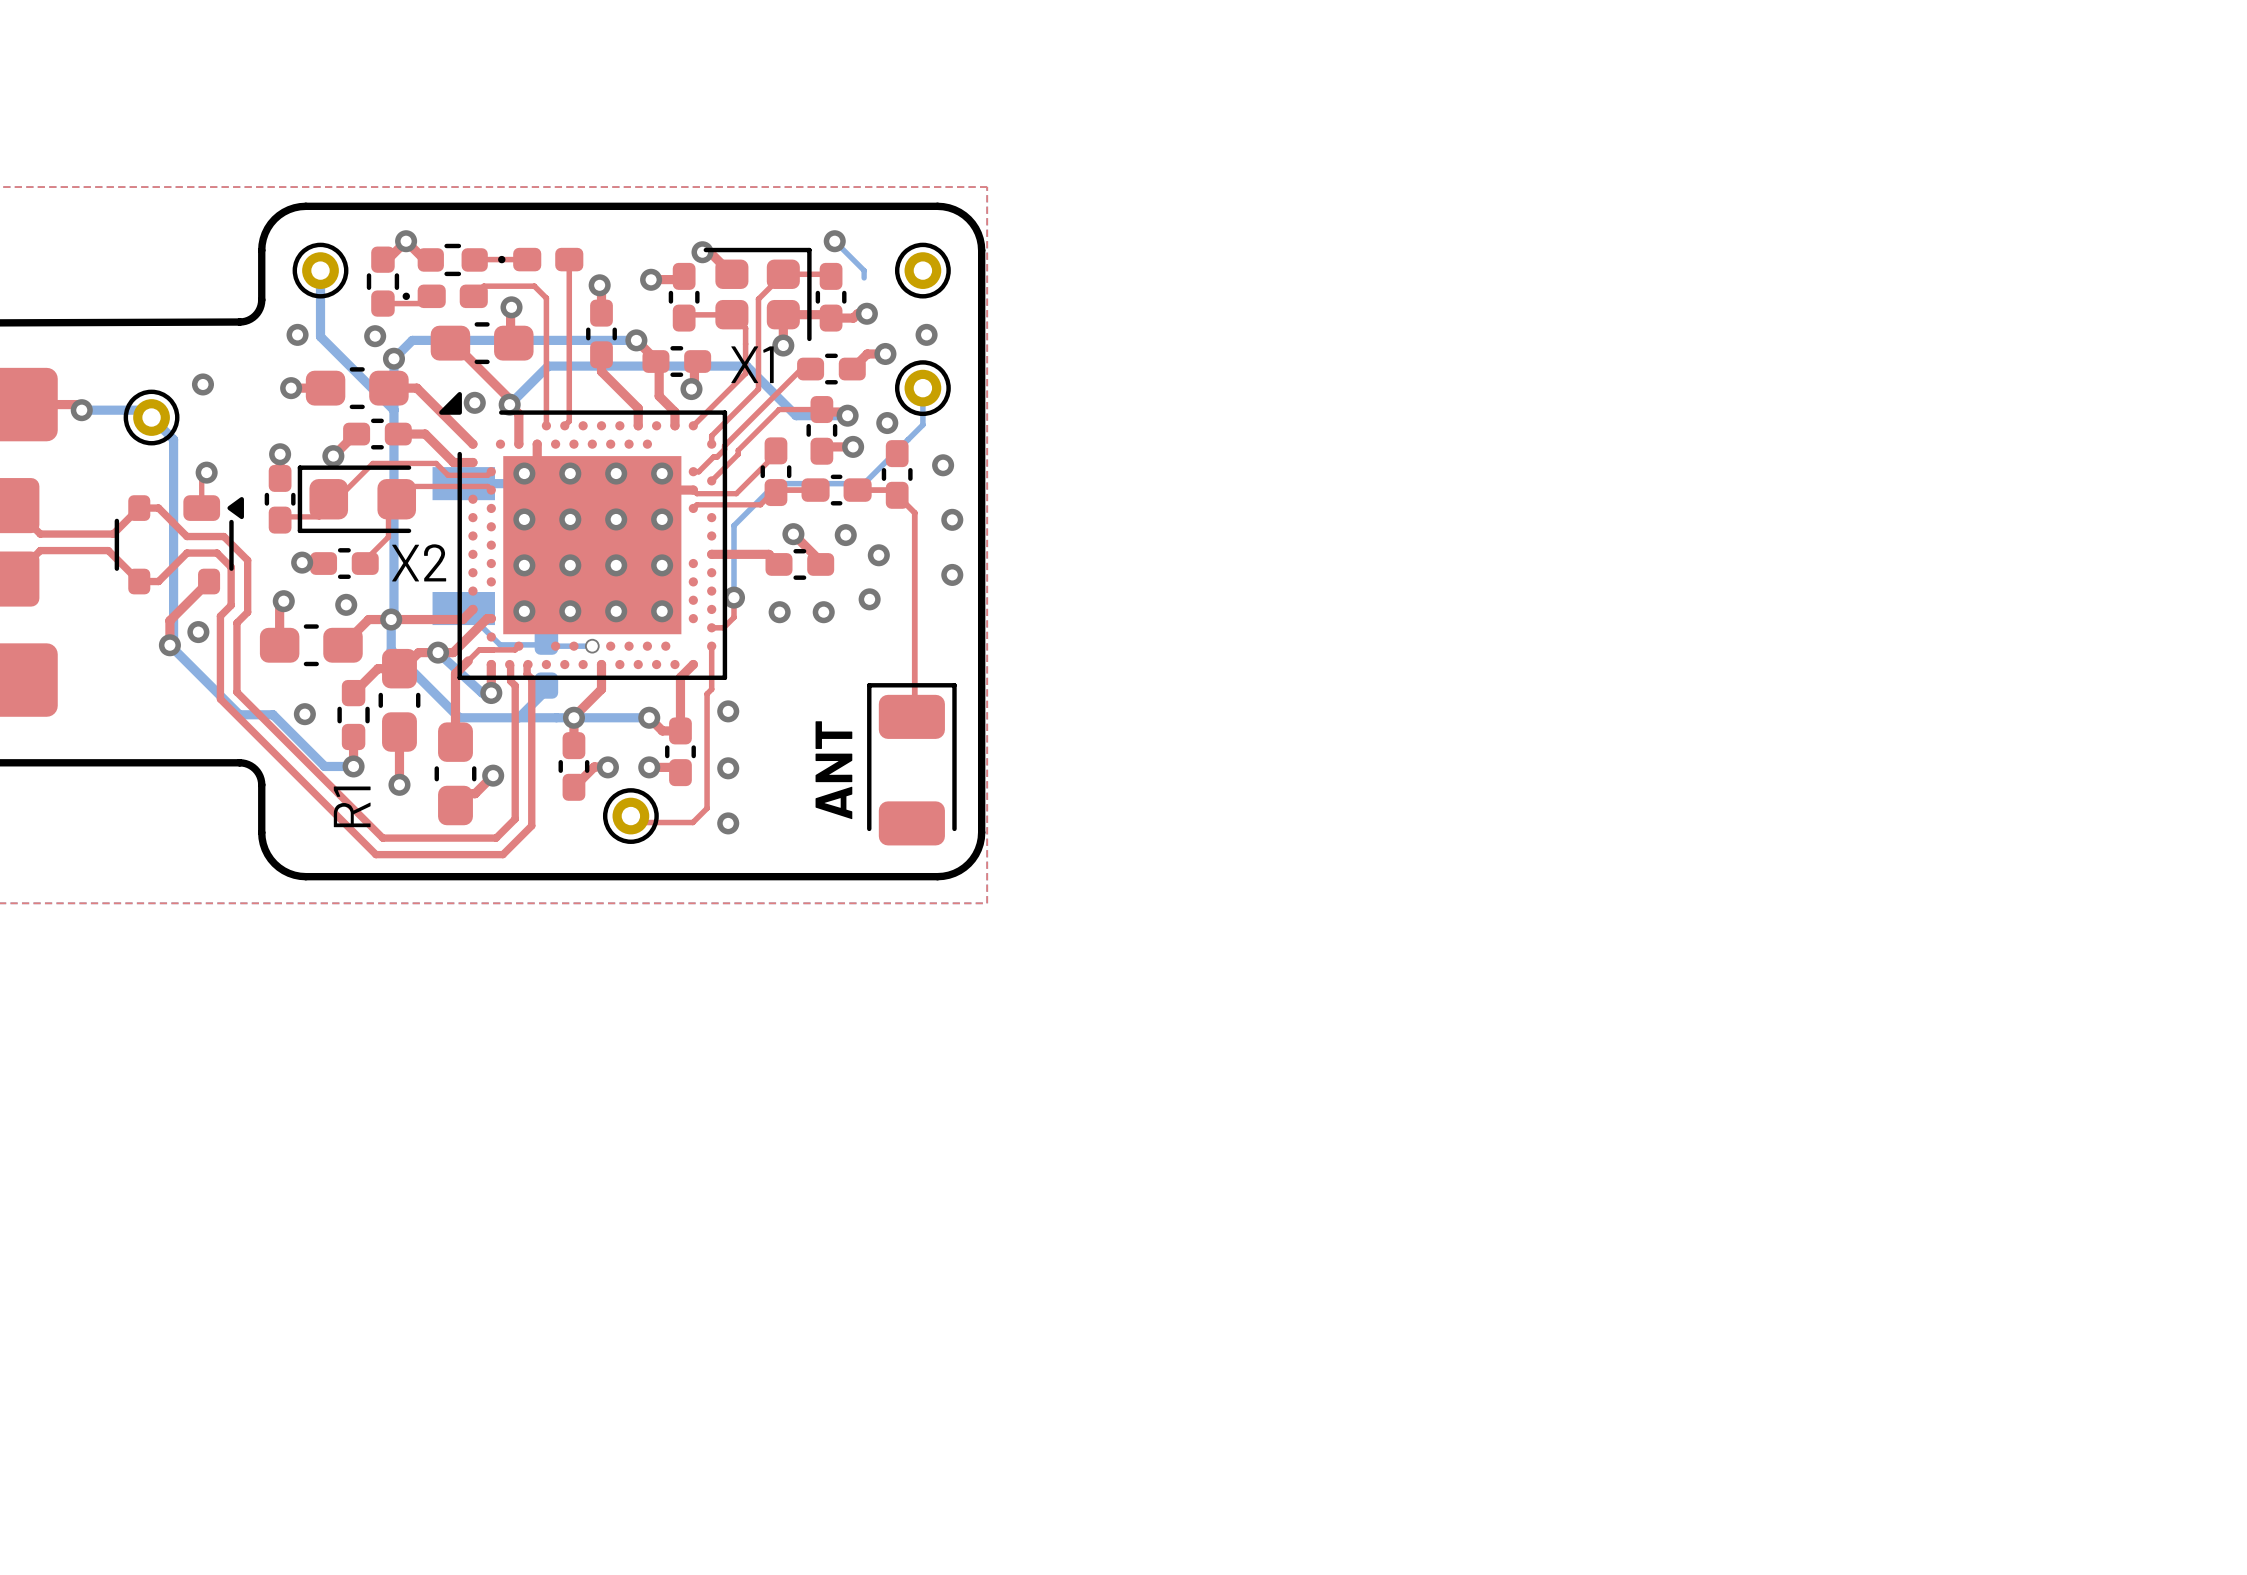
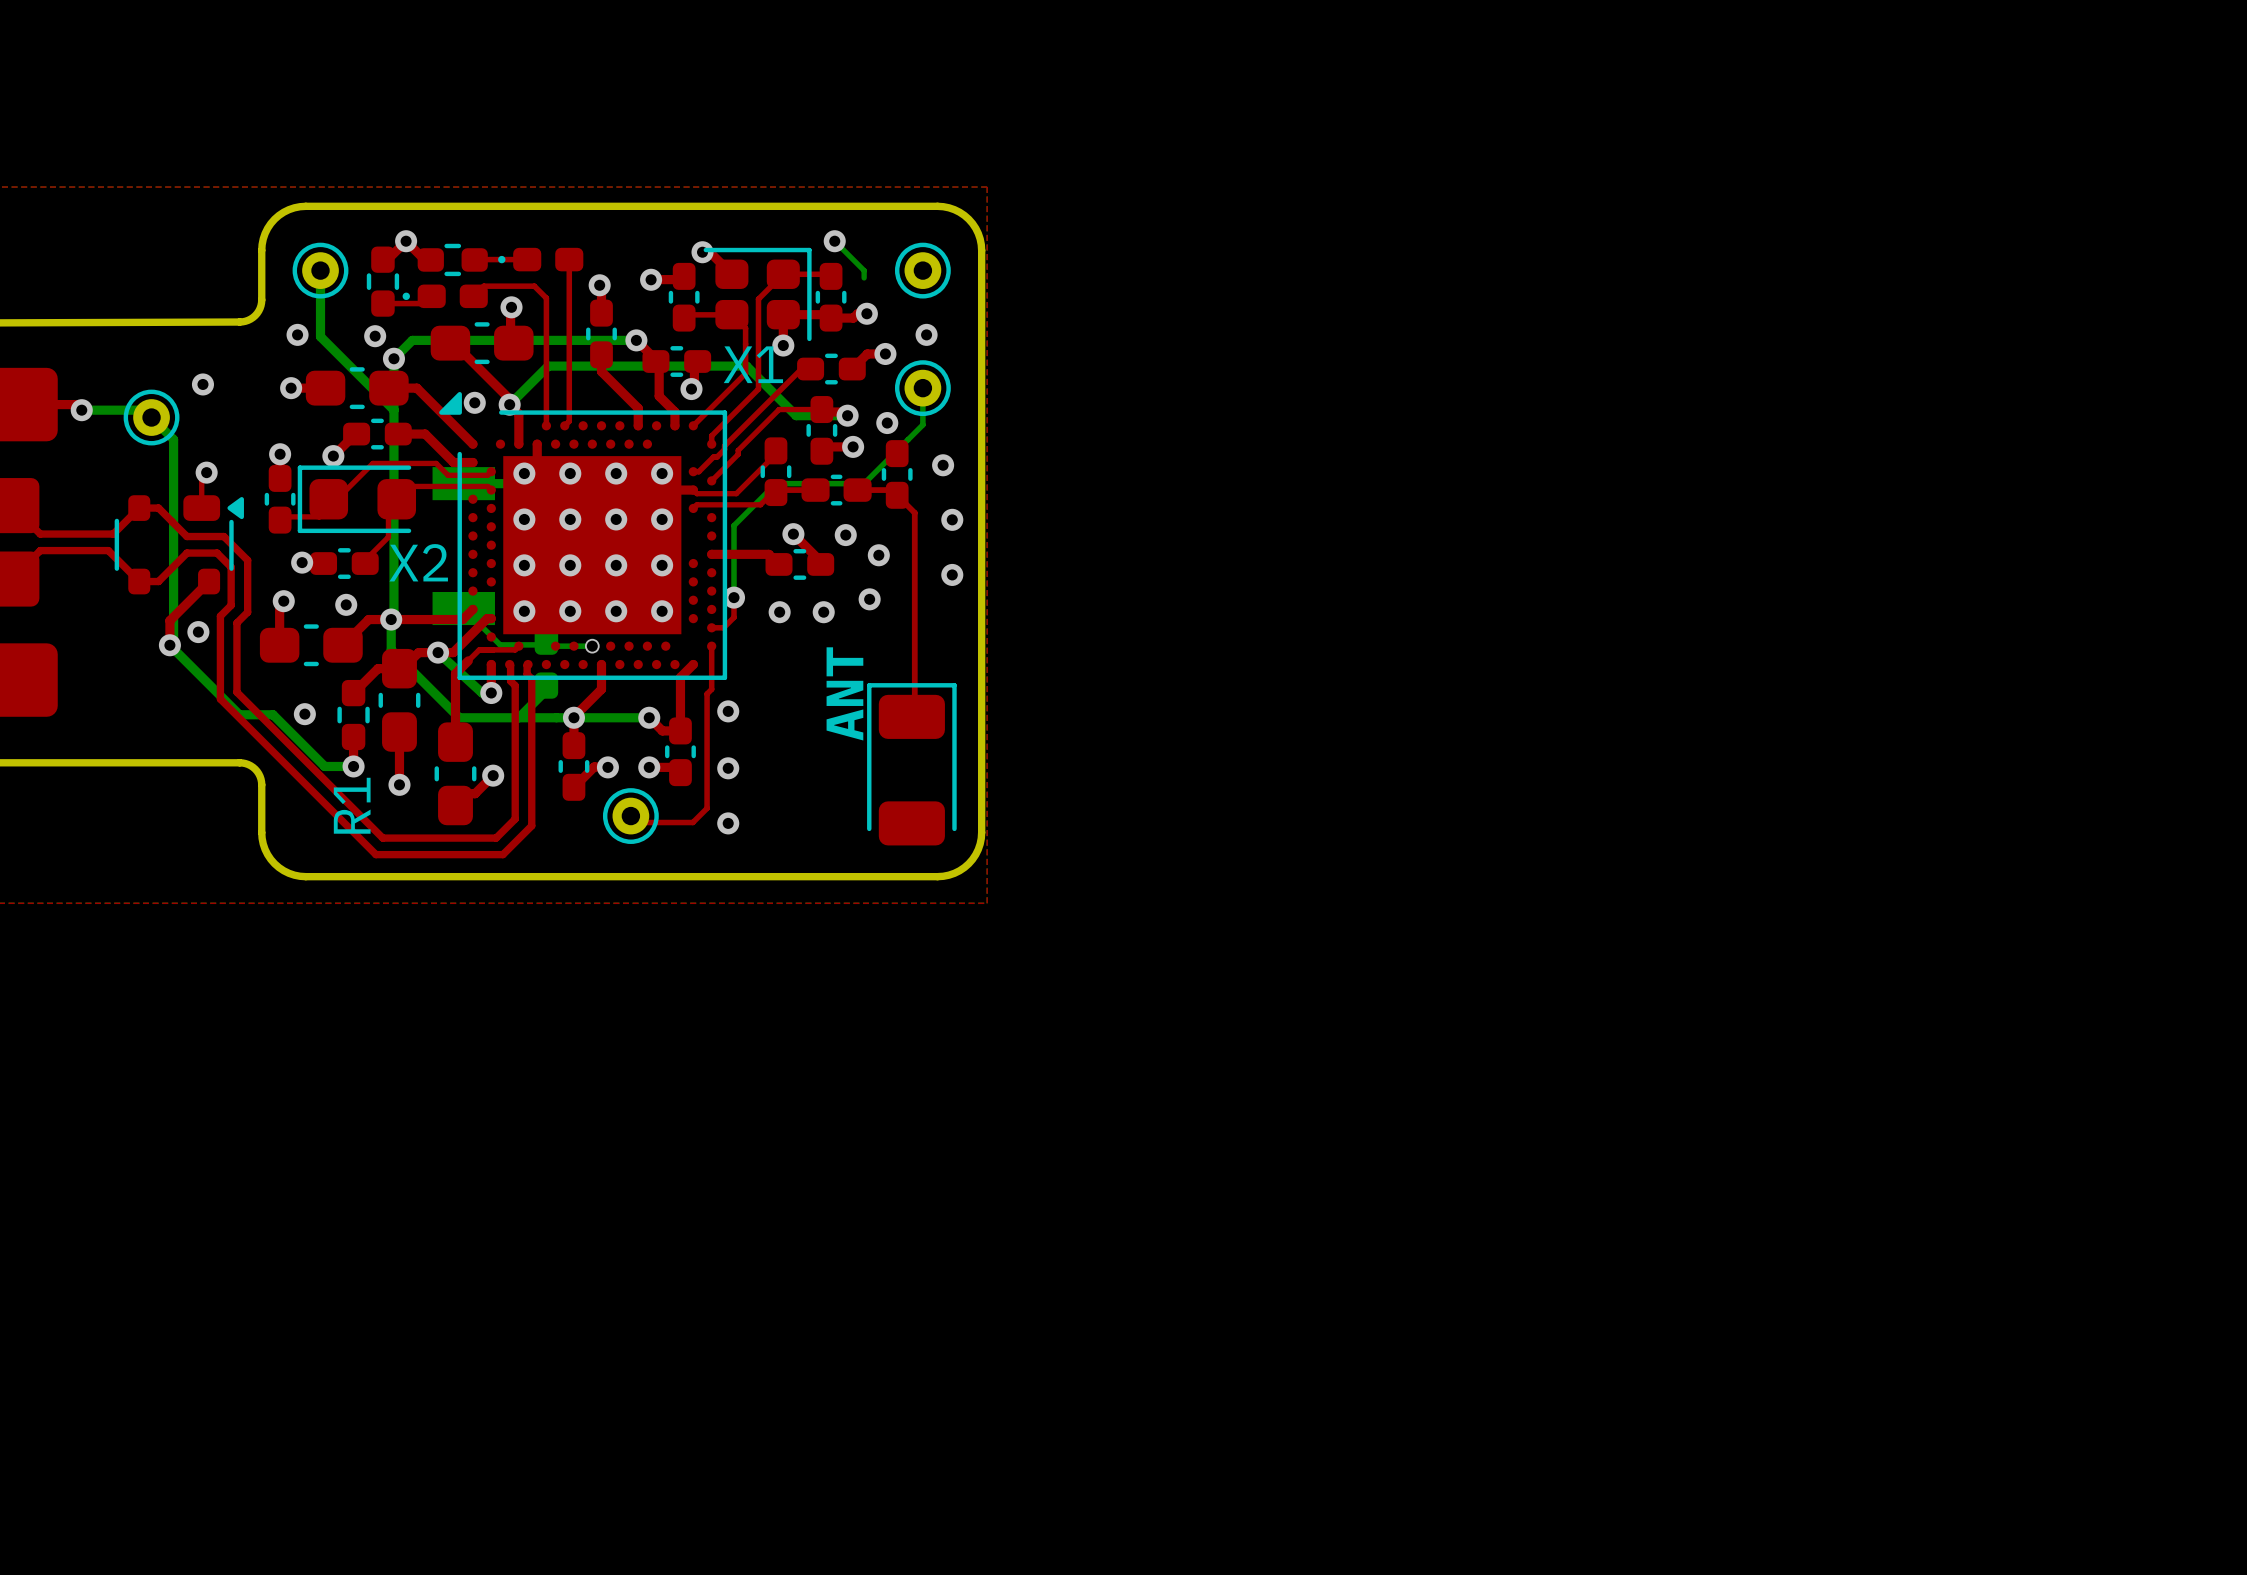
text position: ANT (833, 770) -> ANT (844, 693)

